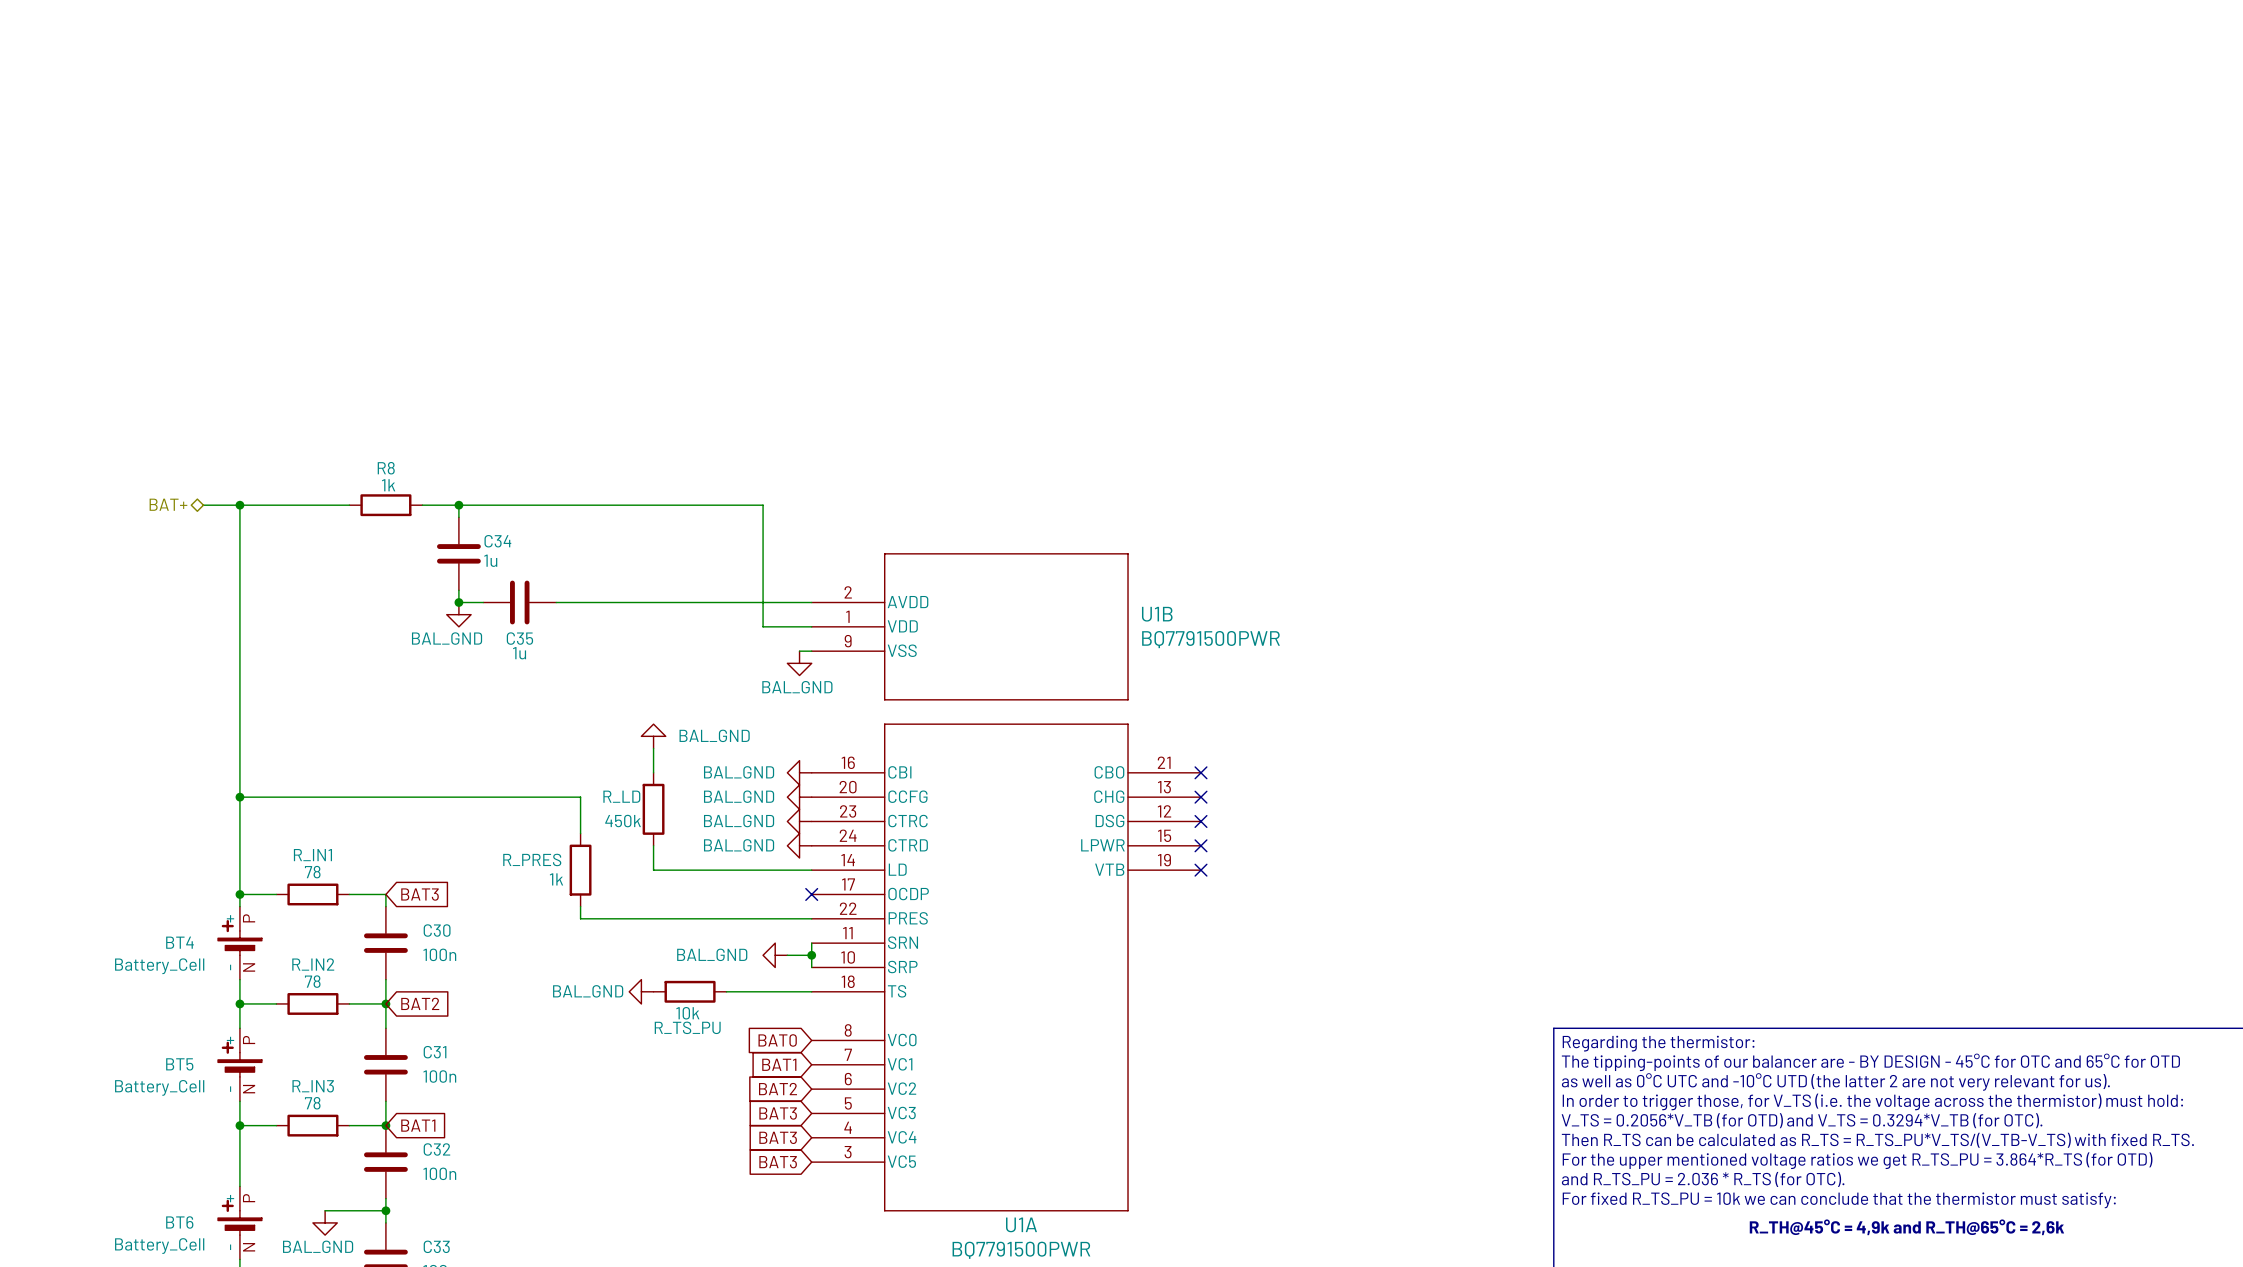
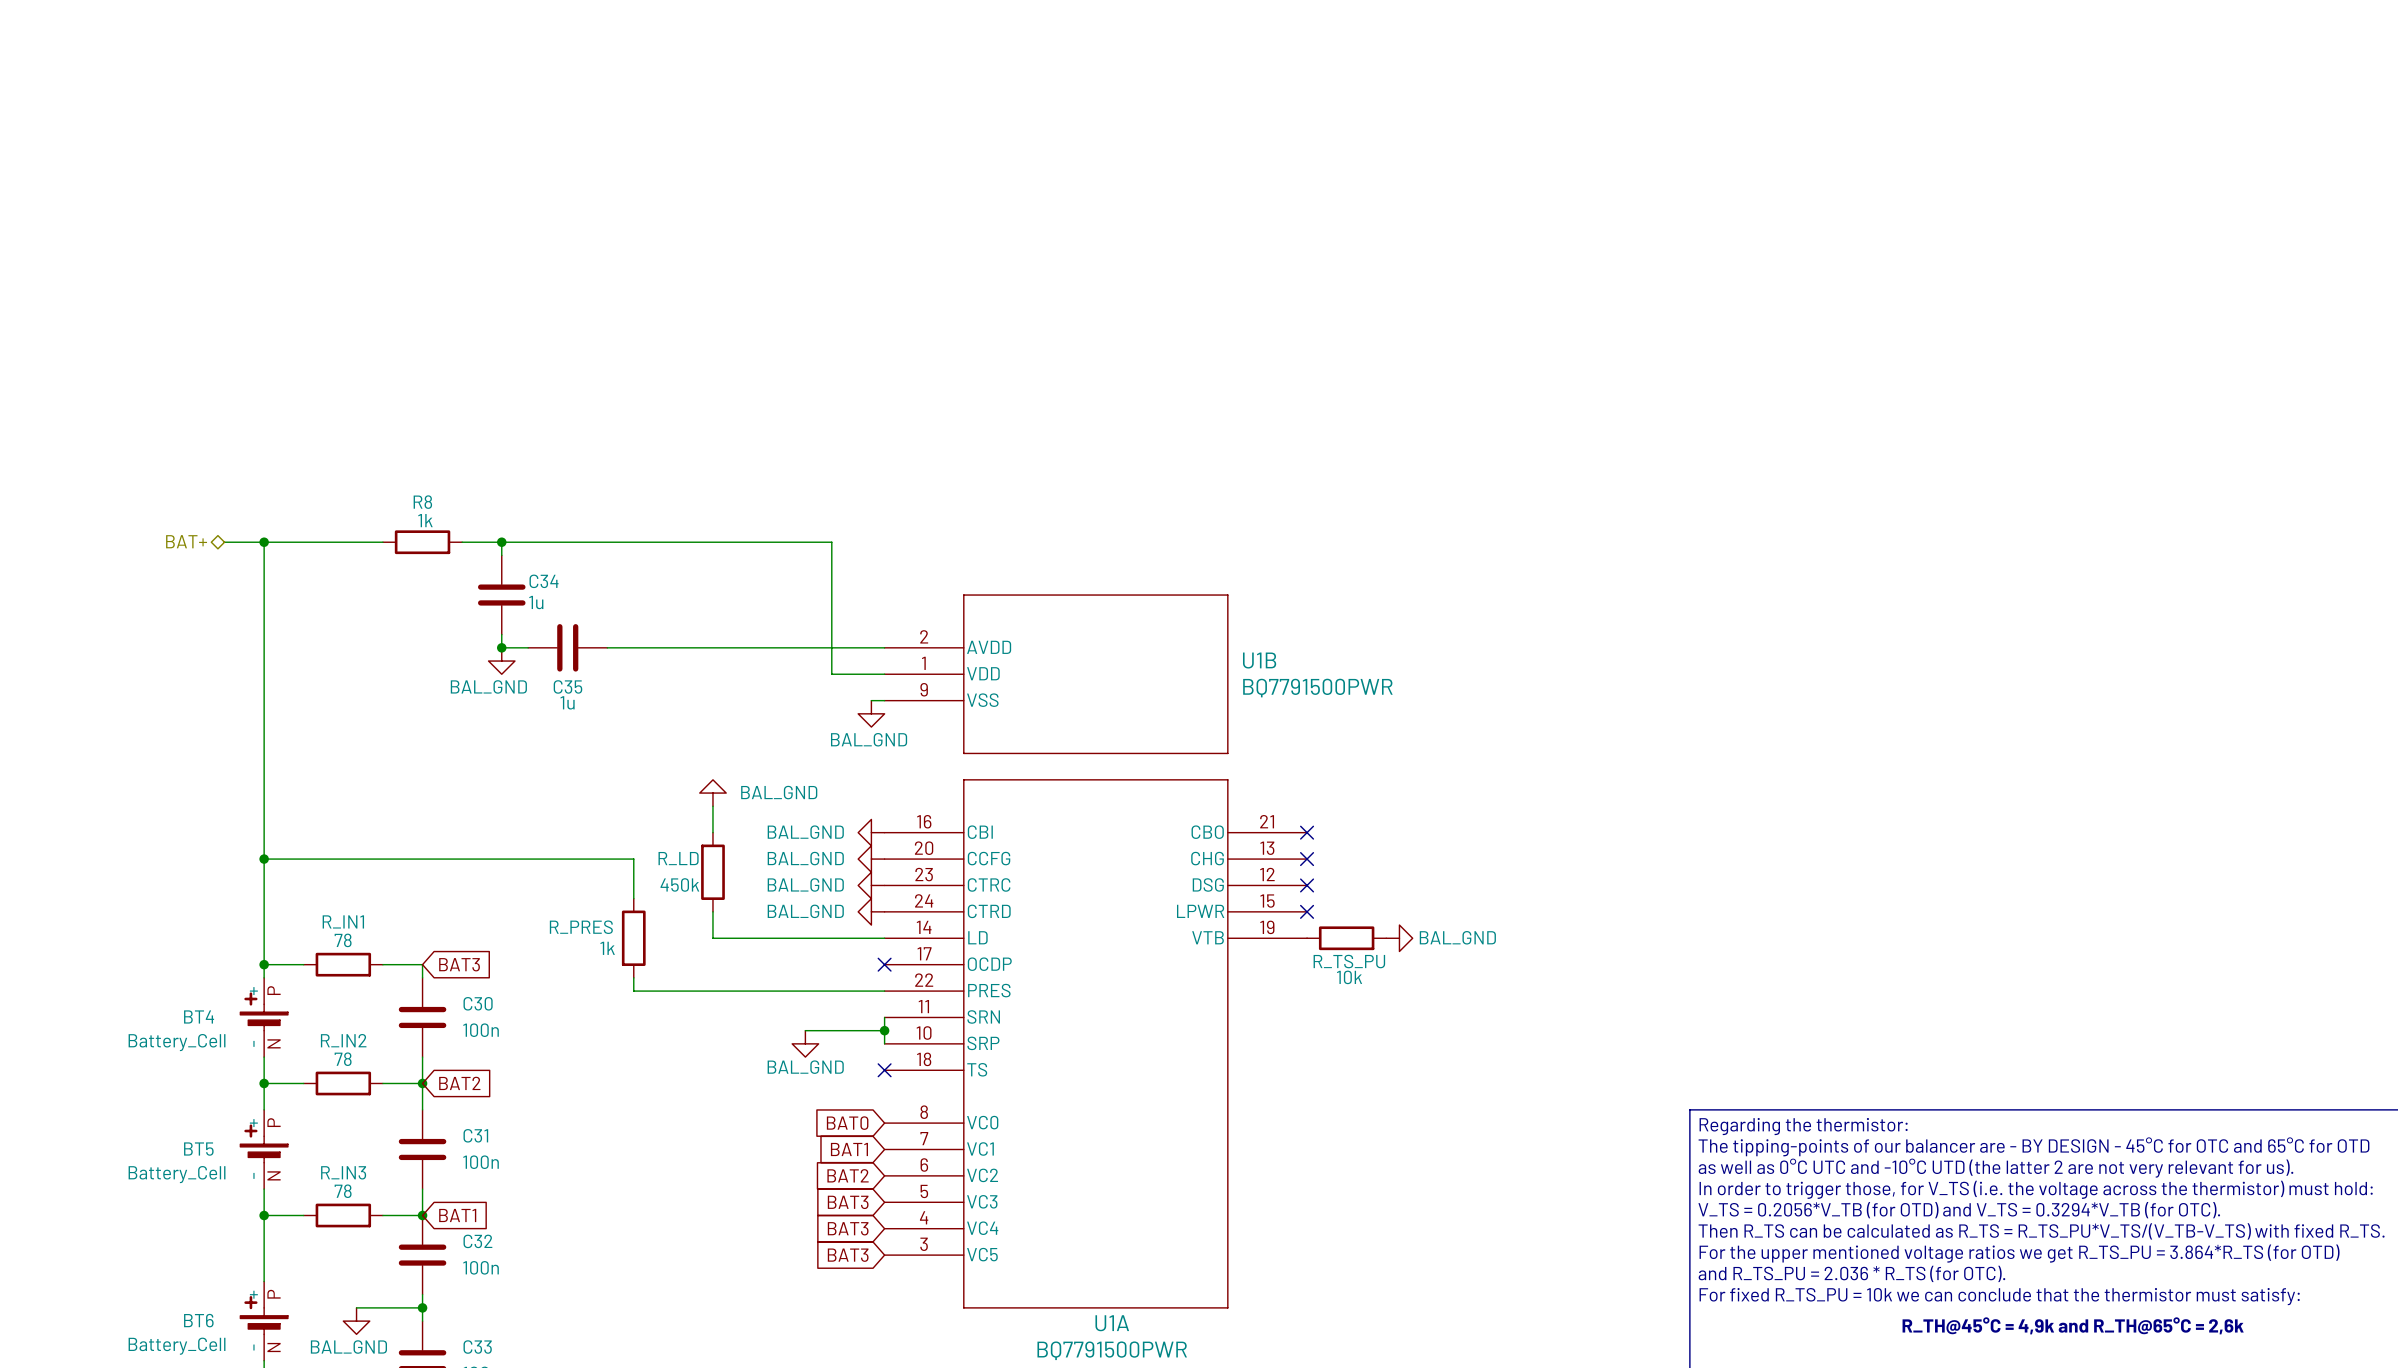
no-connect mark: (1201, 870) -> none
R_TS_PU: none -> 10k (1346, 938)
power symbol: none -> BAL_GND (1399, 938)
power symbol text position: BAL_GND (712, 954) -> BAL_GND (805, 1067)
wire: none -> (805, 1030) (858, 1030)
power symbol rotation: 0° (775, 955) -> 90° counterclockwise (805, 1043)
power symbol position: BAL_GND (775, 955) -> BAL_GND (805, 1043)
power symbol: BAL_GND (641, 991) -> none
R_TS_PU: 10k (690, 991) -> none
wire: (726, 991) (811, 991) -> none
no-connect mark: none -> (884, 1070)

